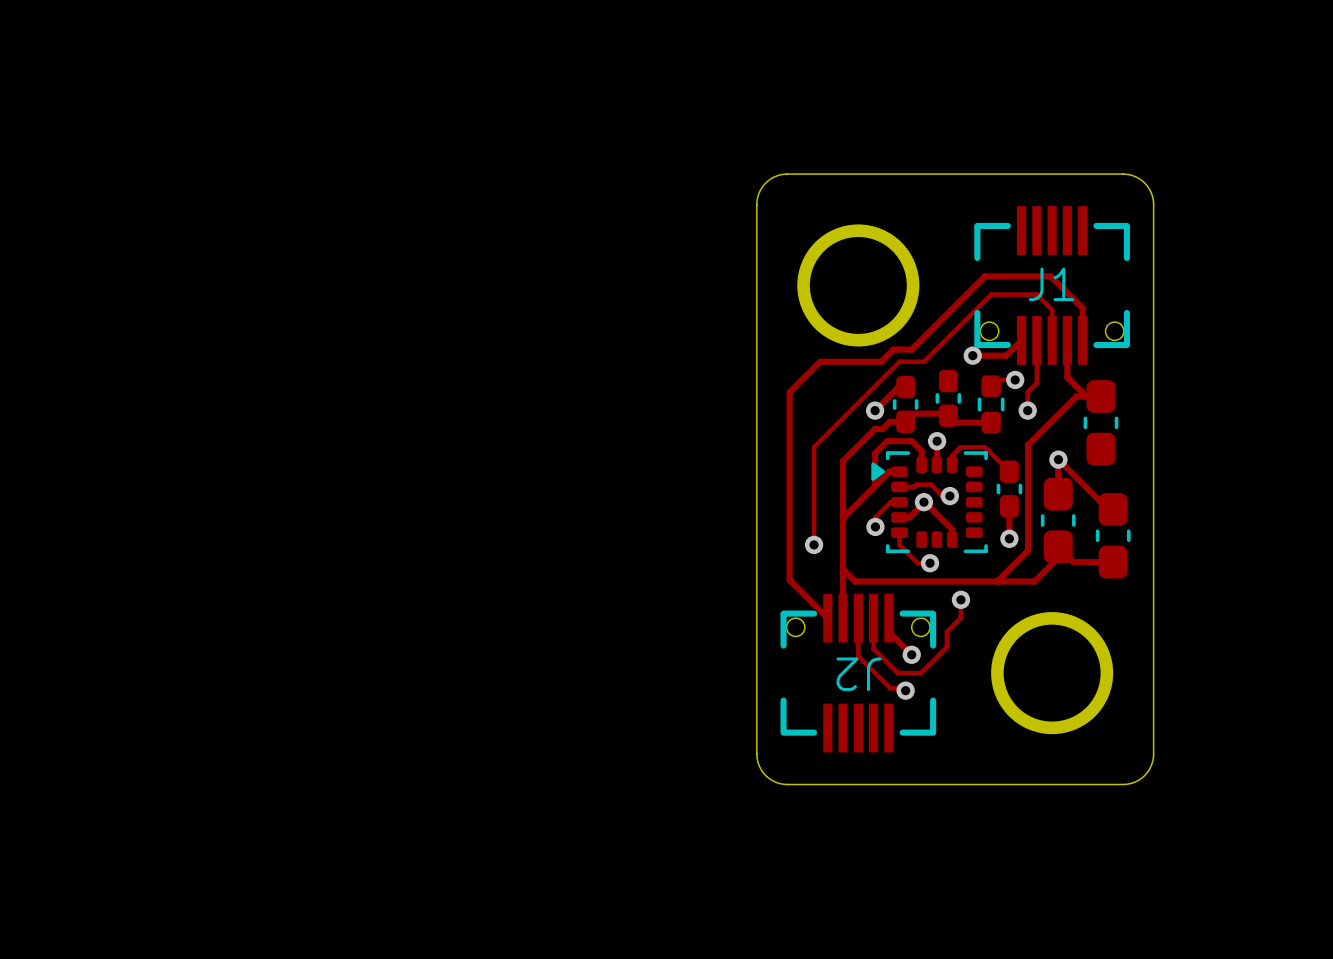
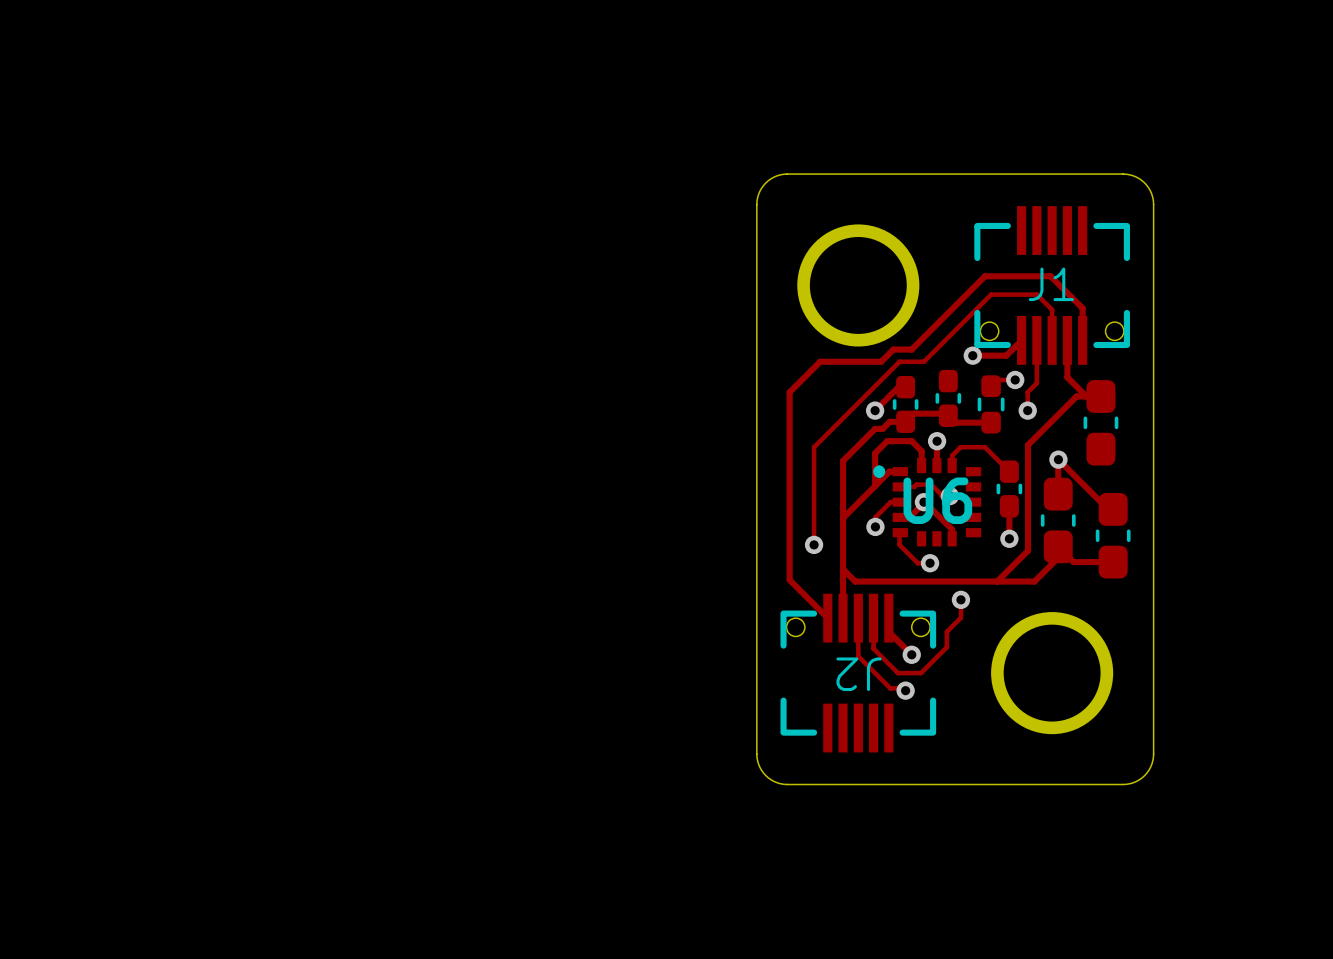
U6: none -> (927, 502)
part: (929, 502) -> none

